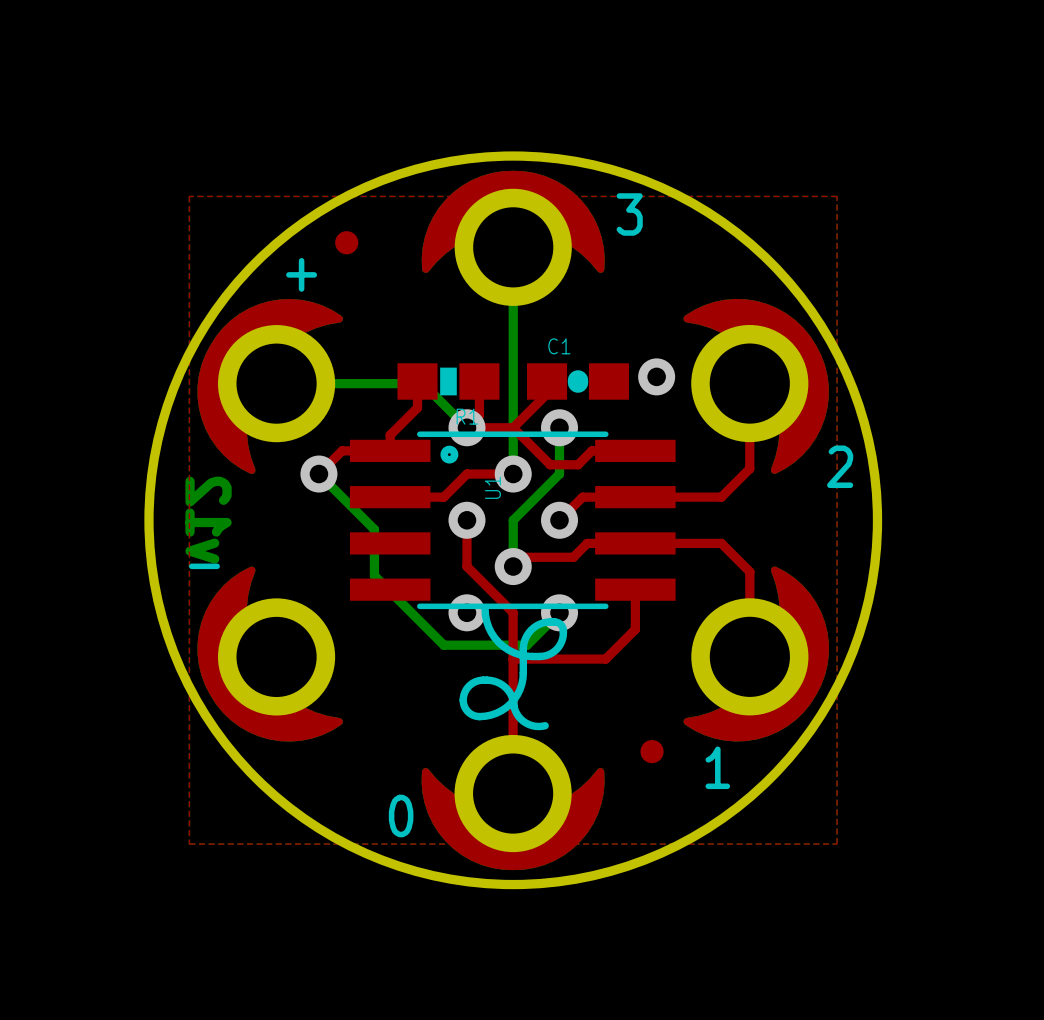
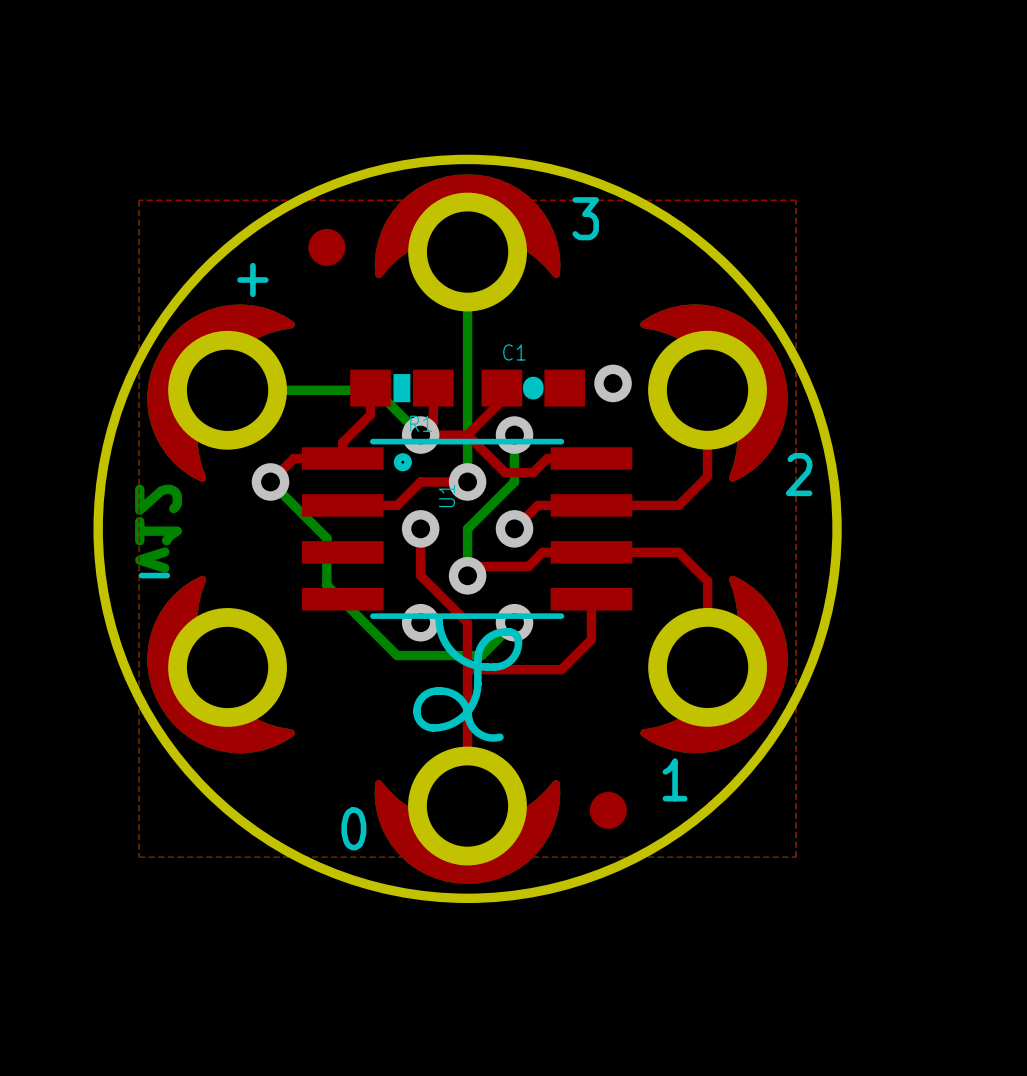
part footprint: [335, 231, 359, 255] -> [308, 228, 346, 266]
part: (652, 751) -> none
part: none -> (608, 810)

